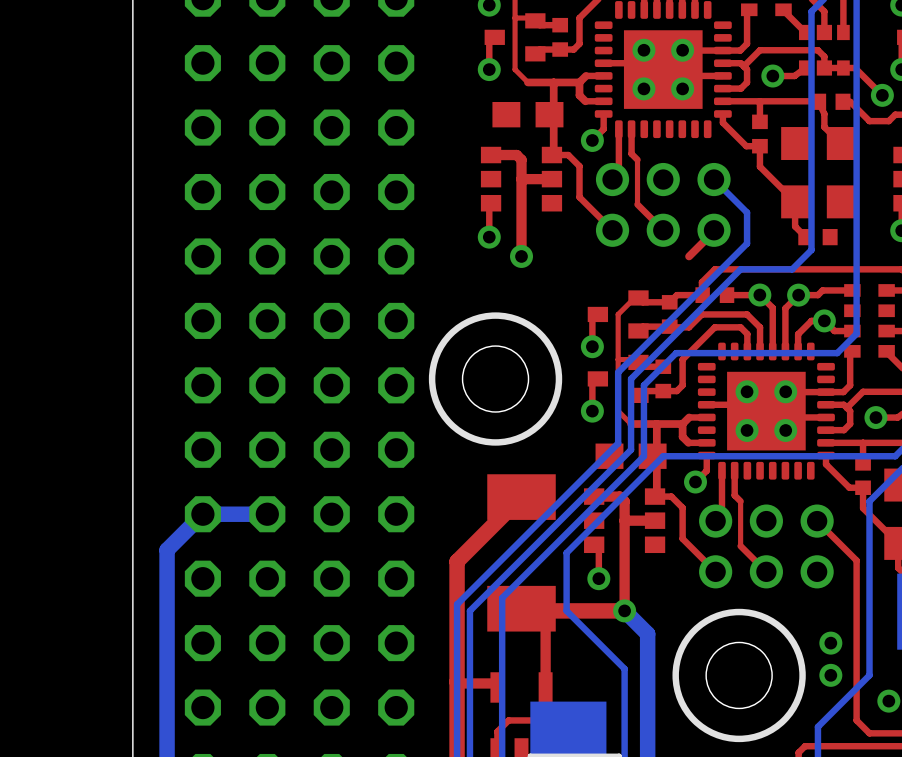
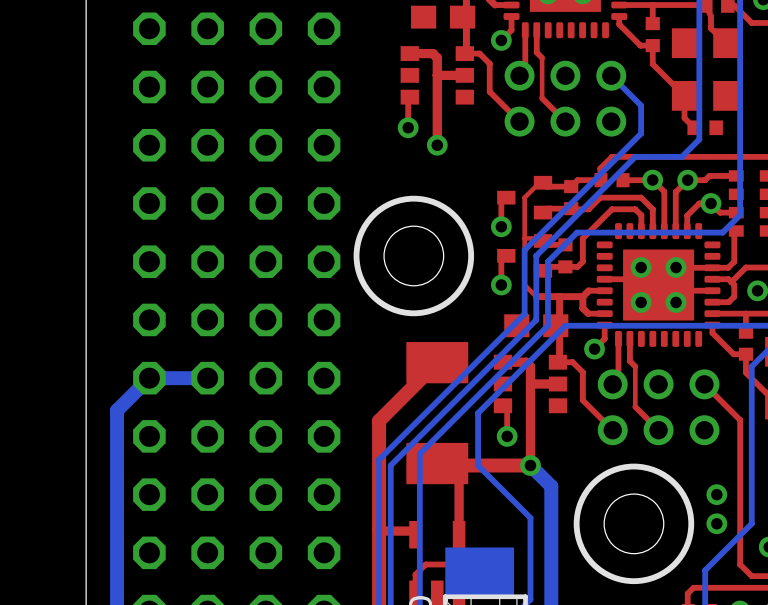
top track: (714, 230) (689, 256) -> none

